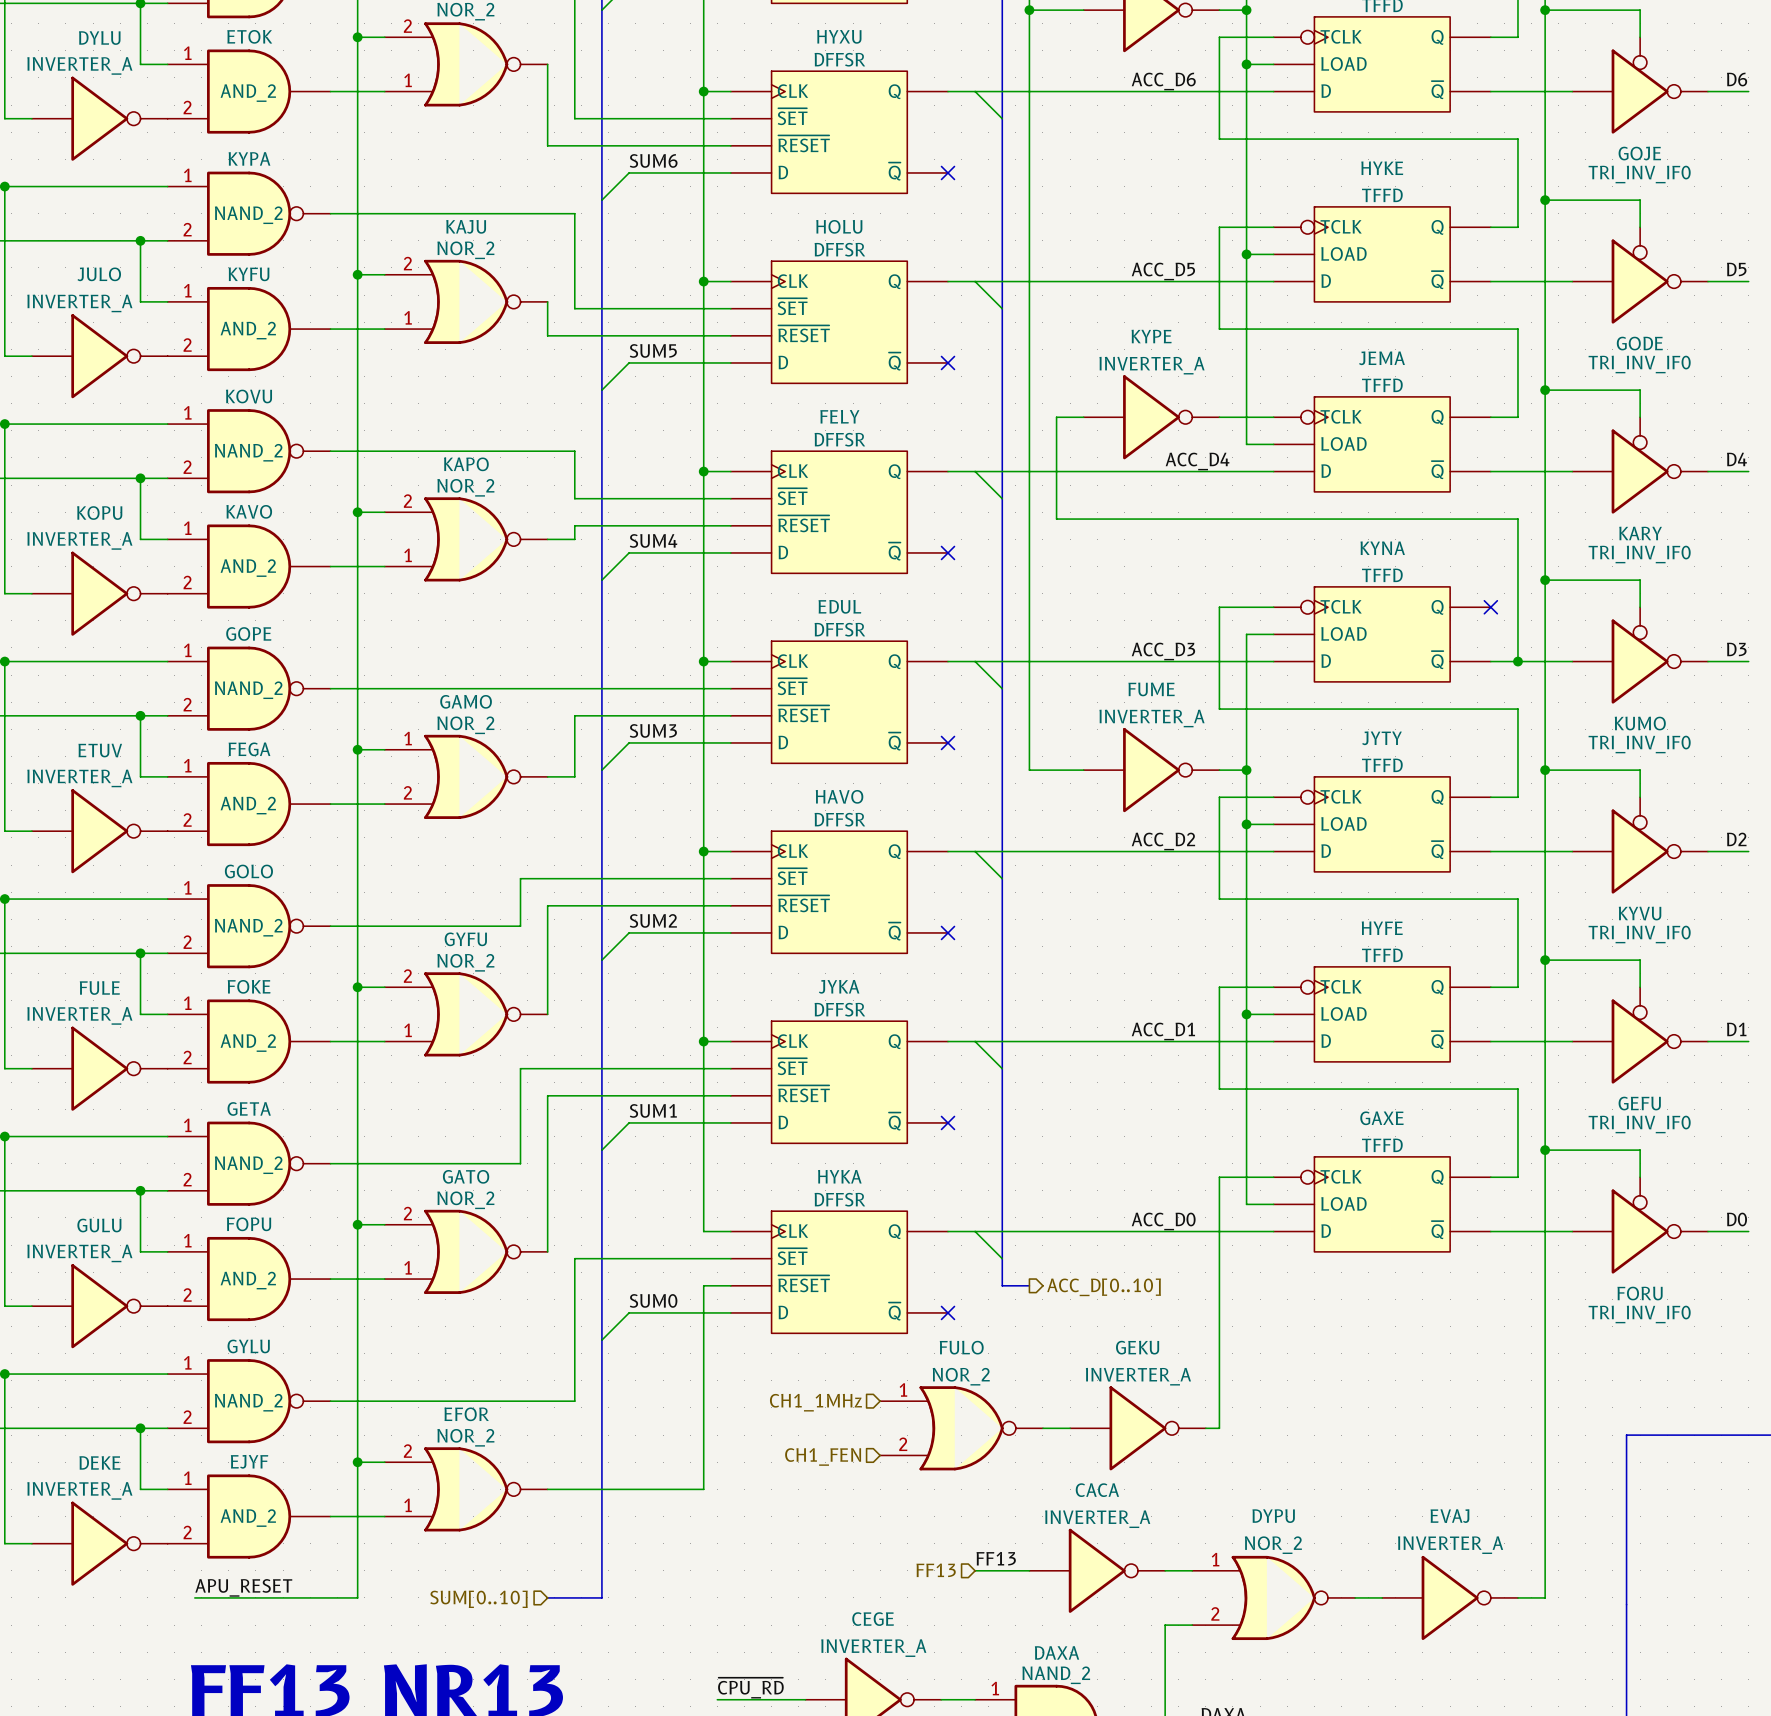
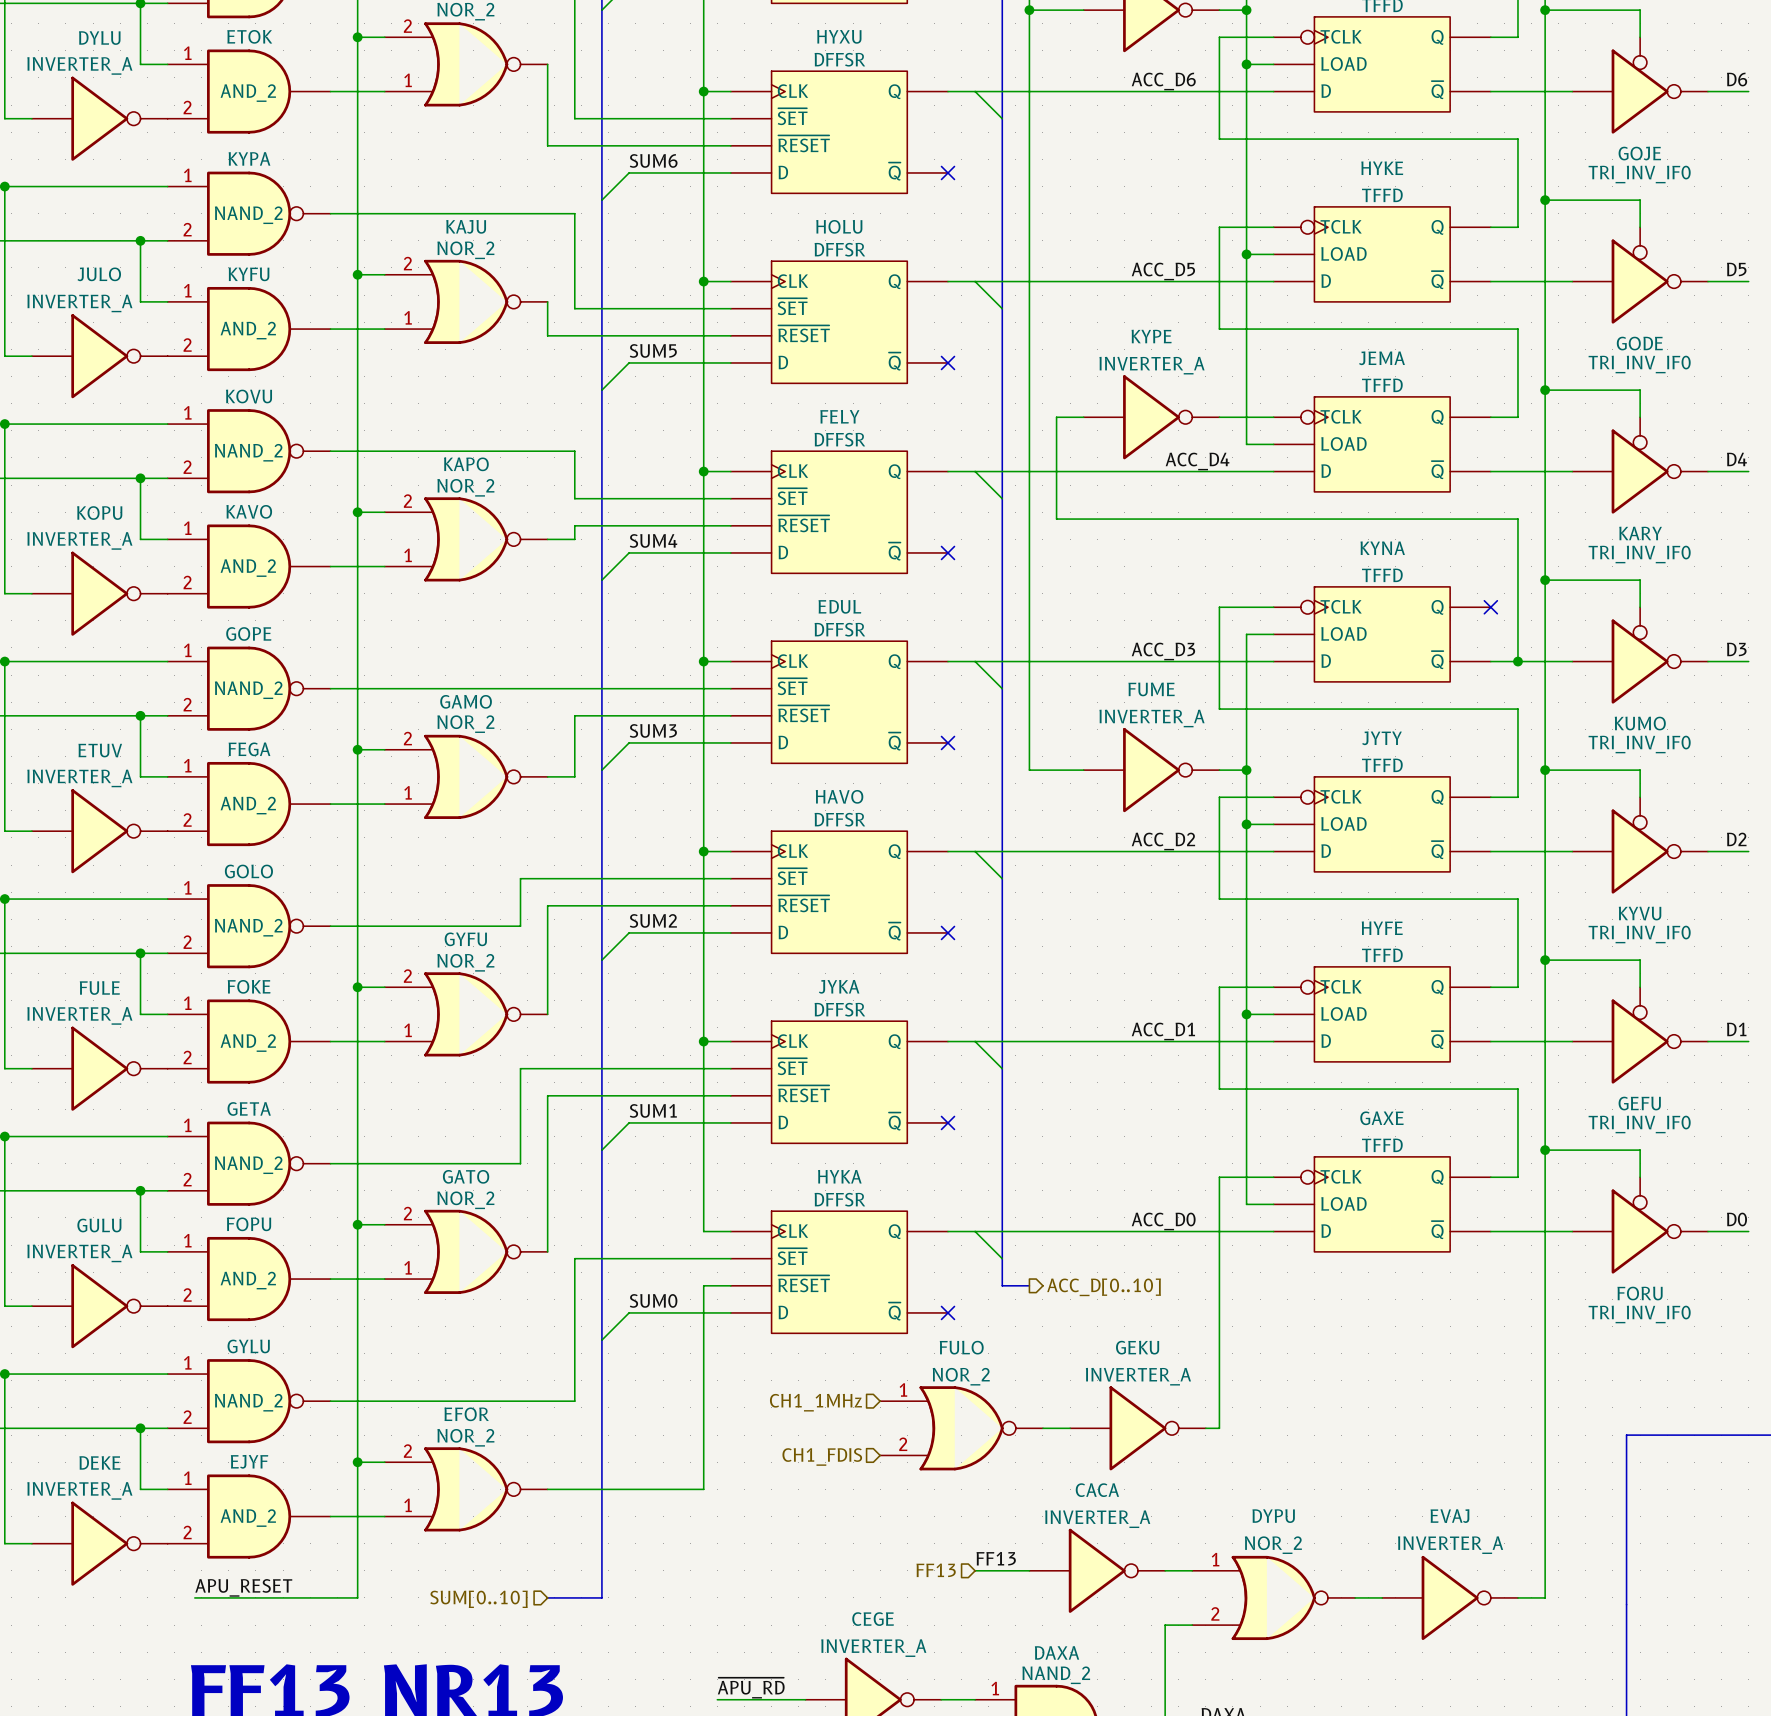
GAMO flip: as is (466, 776) -> up-down (466, 776)
hierarchical label: CH1_FEN (823, 1456) -> CH1_FDIS (822, 1456)
label: ~{CPU_RD} (750, 1688) -> ~{APU_RD} (751, 1688)

